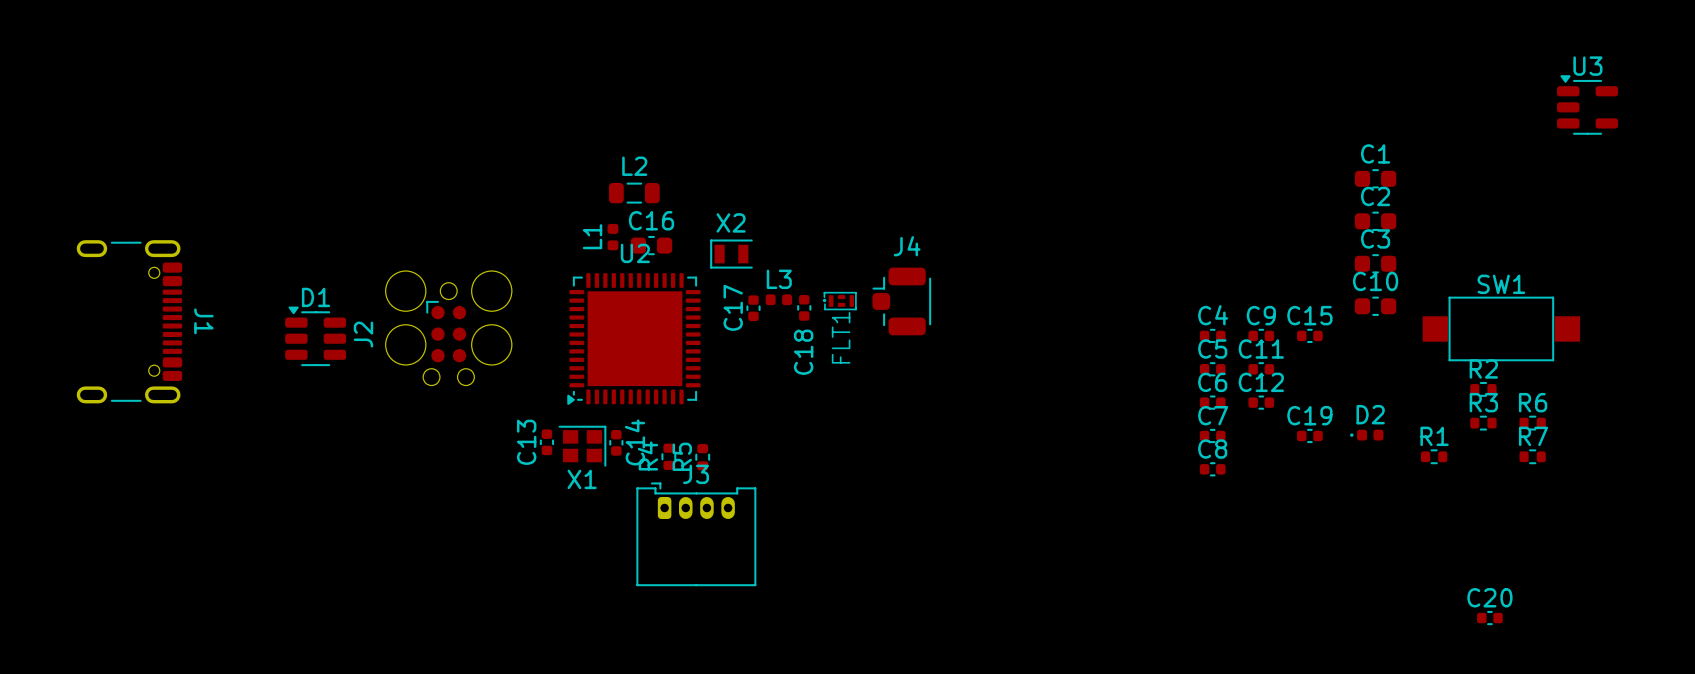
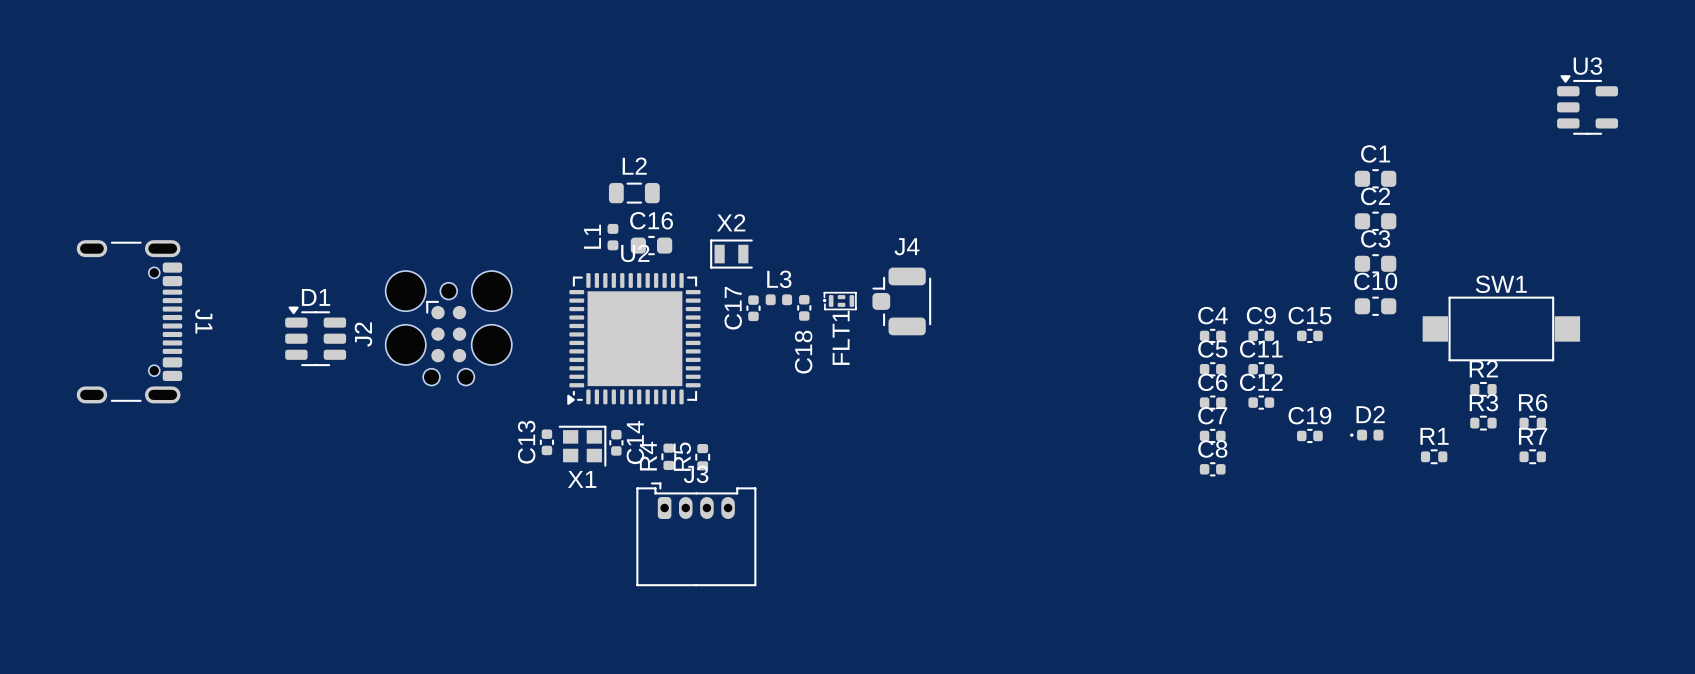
C20: (1489, 618) -> none

